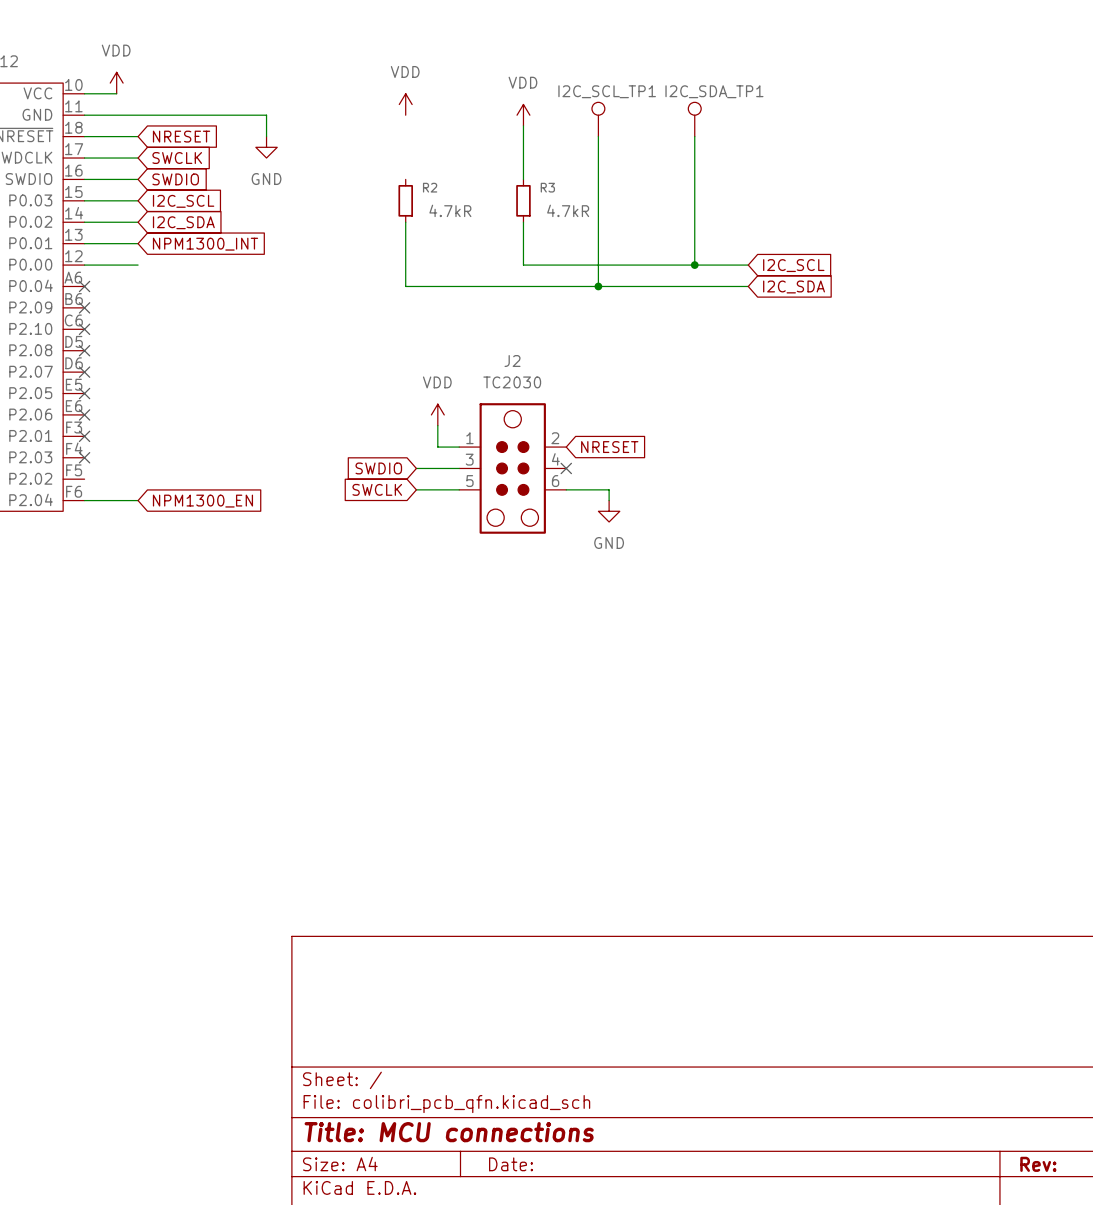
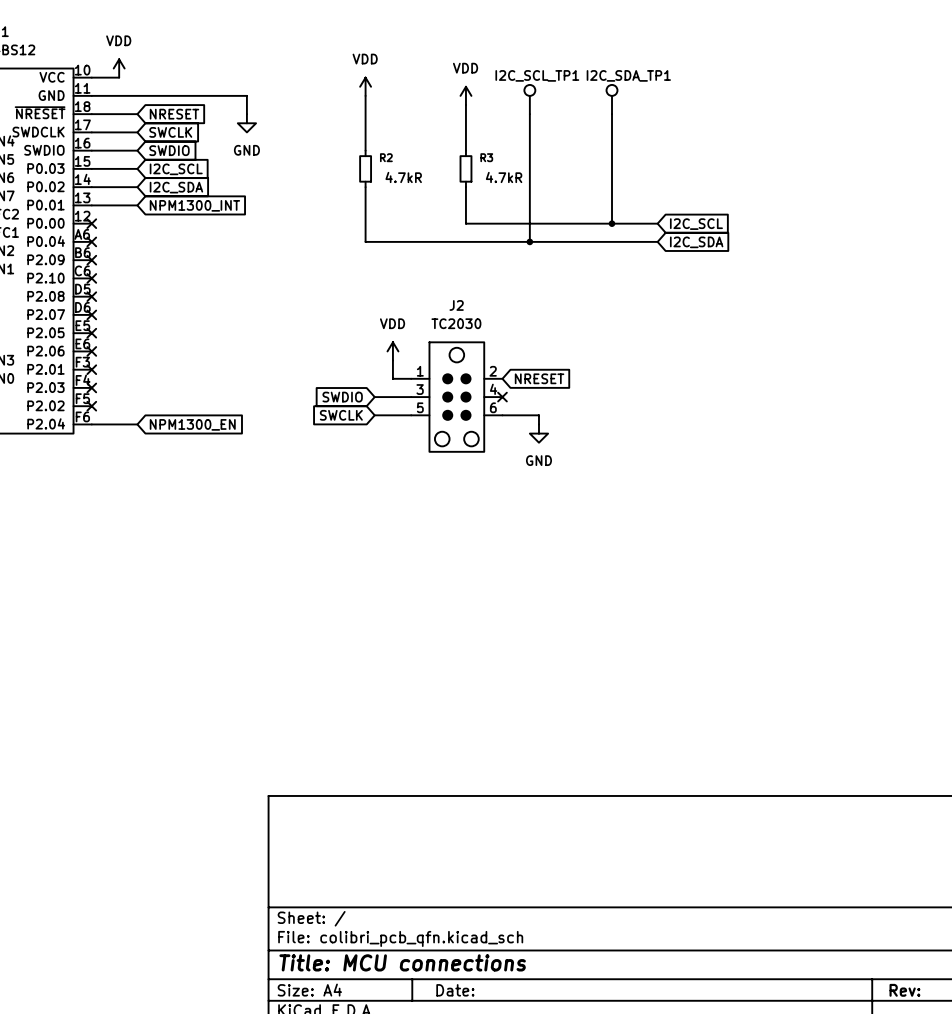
wire: none -> (365, 95) (365, 150)
wire: (84, 265) (138, 265) -> none
no-connect mark: none -> (91, 223)
no-connect mark: none -> (91, 406)

